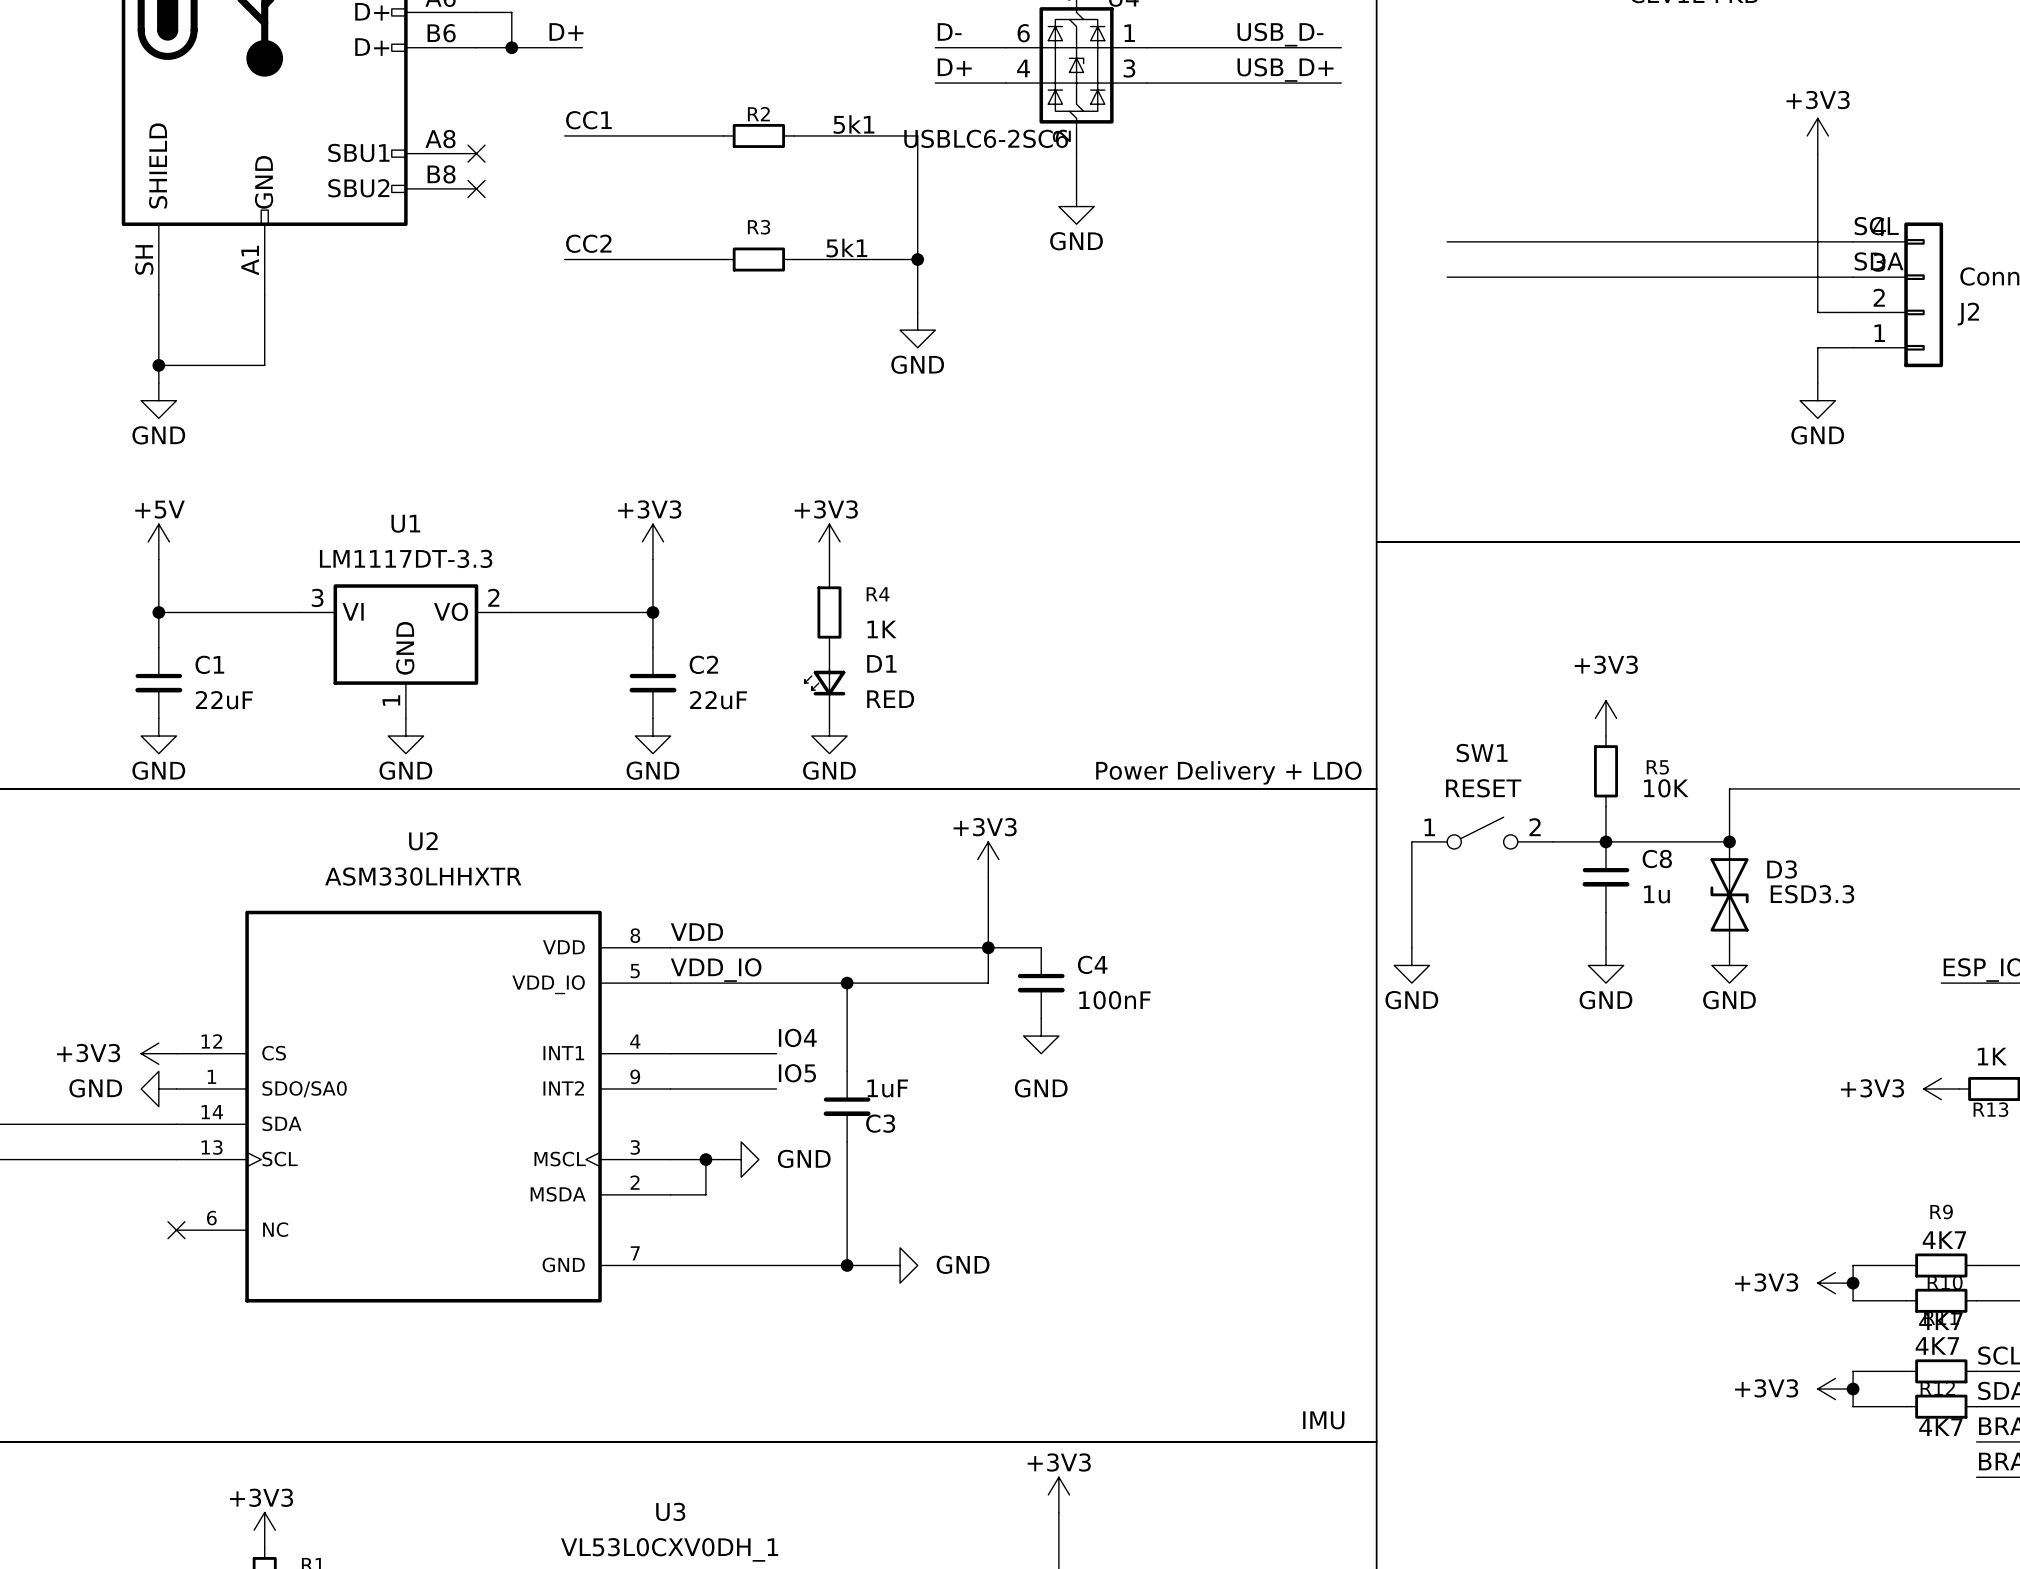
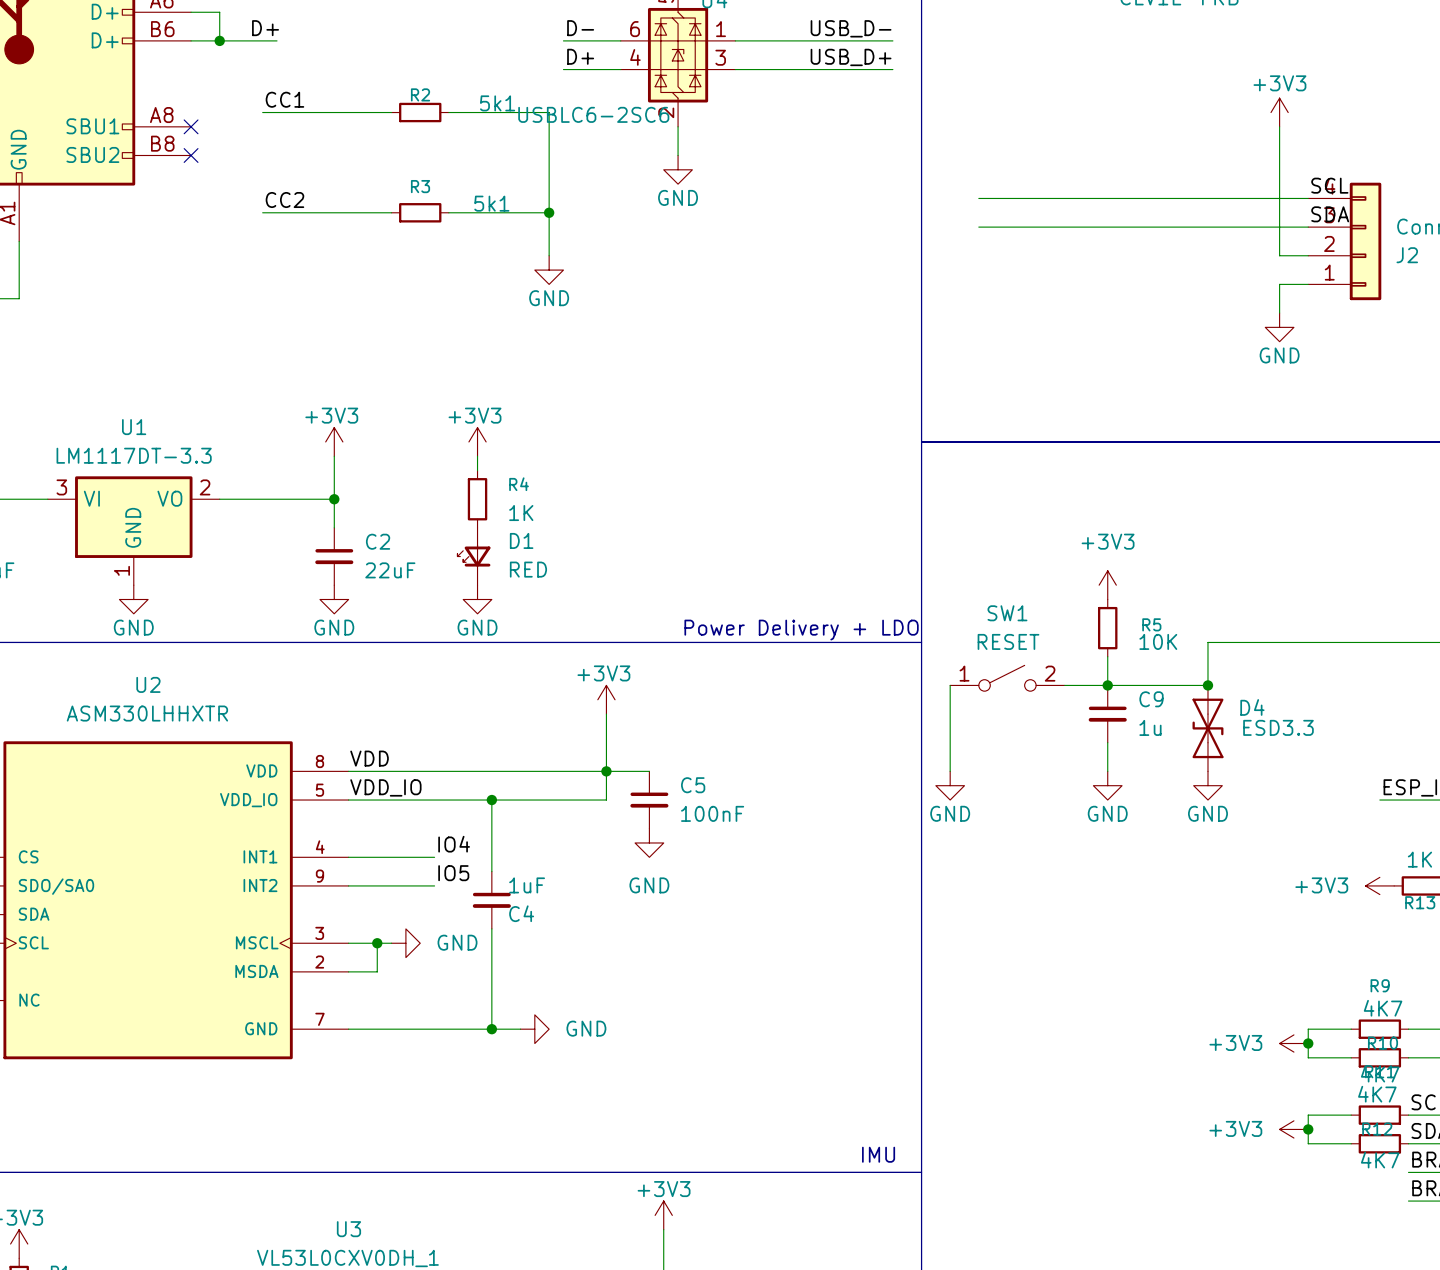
C8 name: C8 (1657, 859) -> C9 (1151, 699)
D3 name: D3 (1782, 869) -> D4 (1252, 707)
C4 name: C4 (1092, 964) -> C5 (693, 785)
C3 name: C3 (880, 1123) -> C4 (521, 913)

